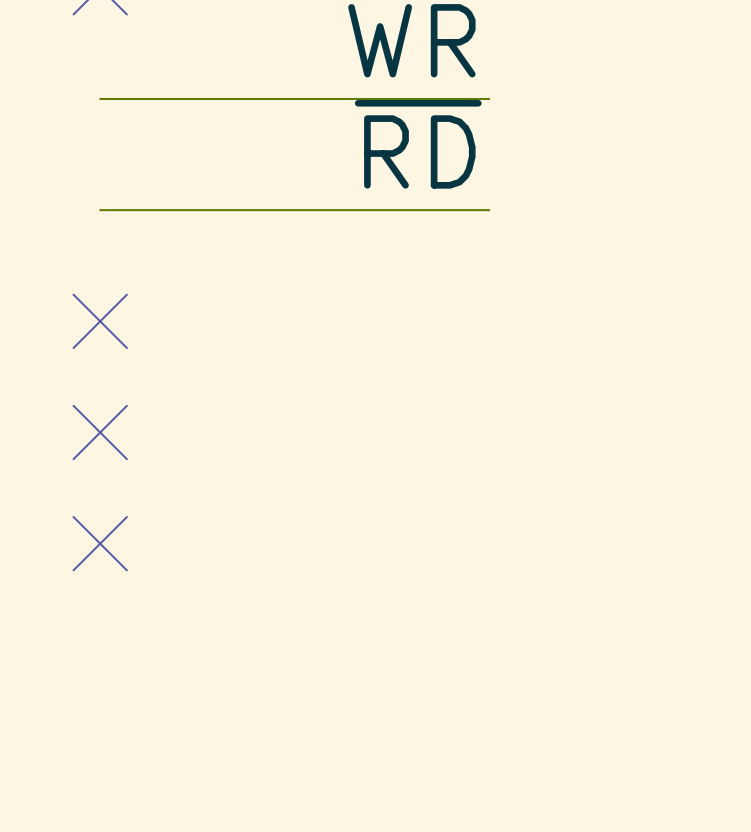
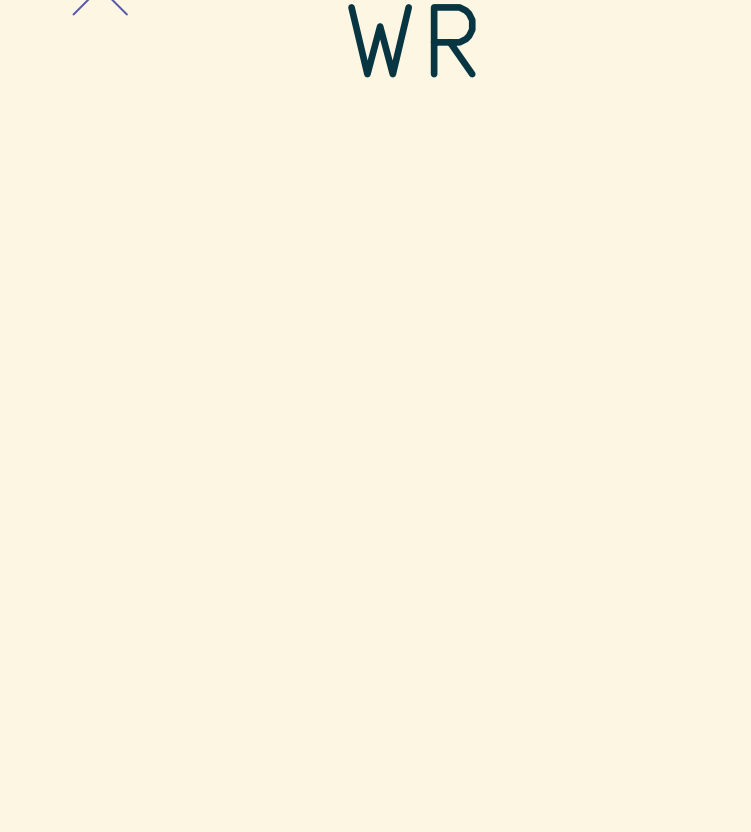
wire: (100, 98) (489, 98) -> none
label: ~{RD} (418, 144) -> none
wire: (100, 210) (489, 210) -> none
no-connect mark: (100, 321) -> none
no-connect mark: (100, 432) -> none
no-connect mark: (100, 543) -> none

